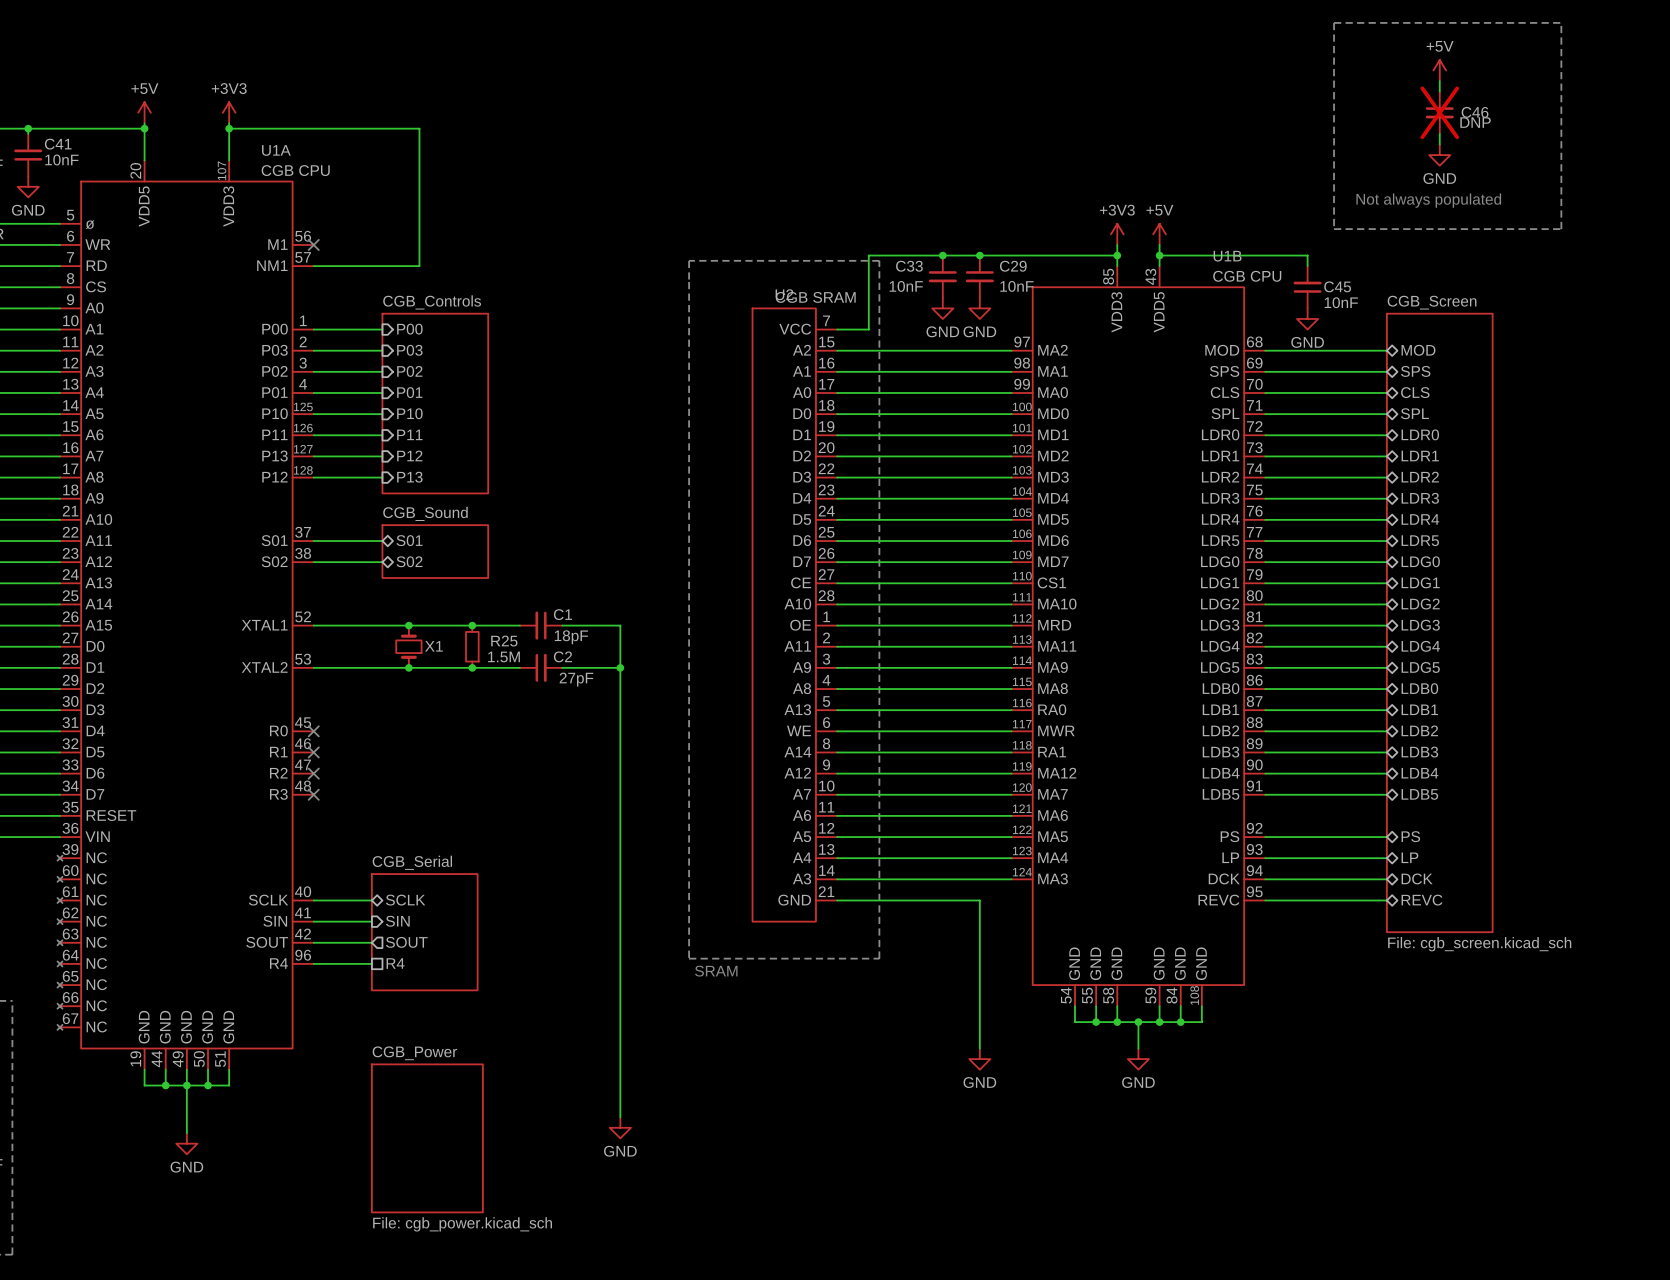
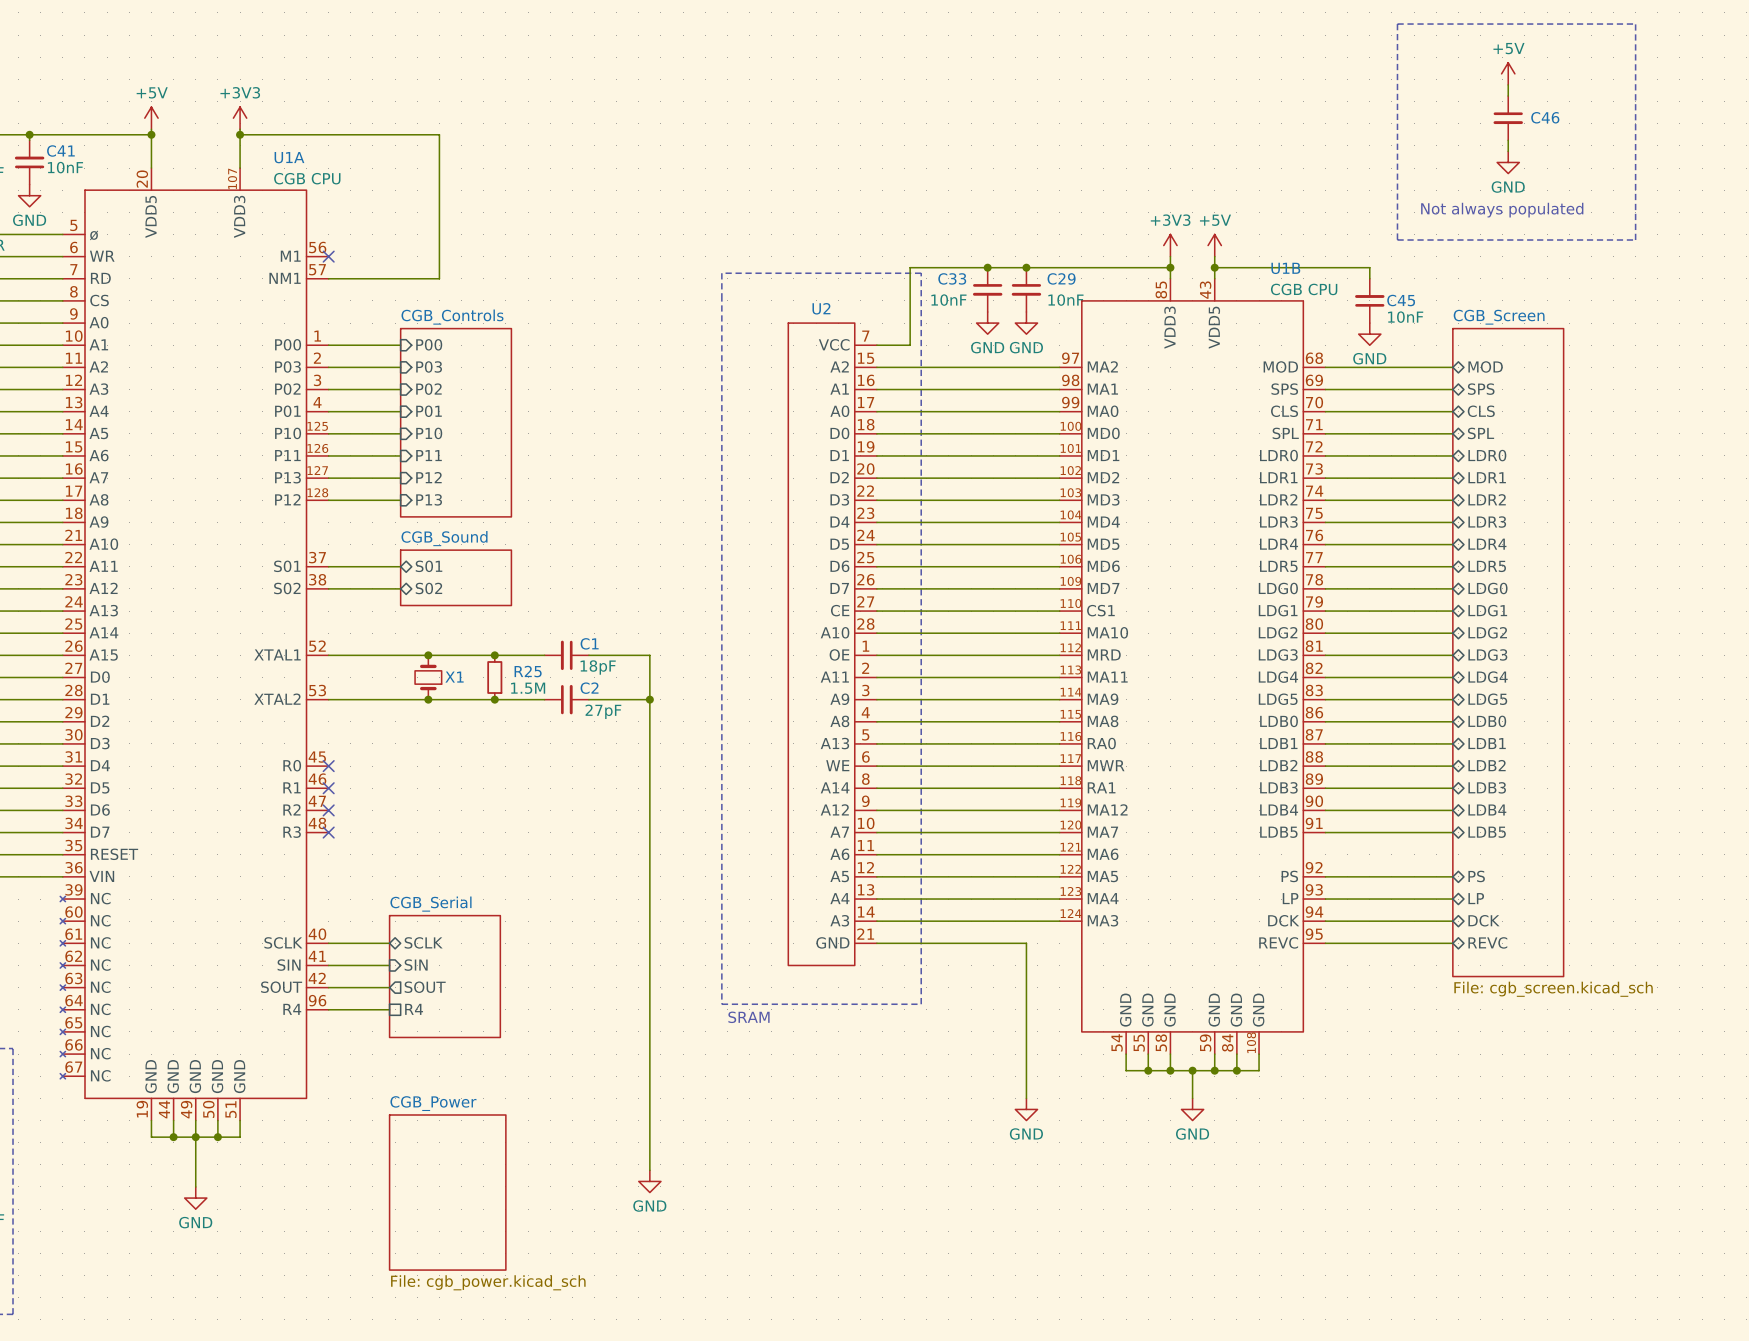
C46 do-not-place cross: (1439, 112) -> none
C46 value: DNP (1475, 122) -> none
U2 value: CGB SRAM (815, 297) -> none

